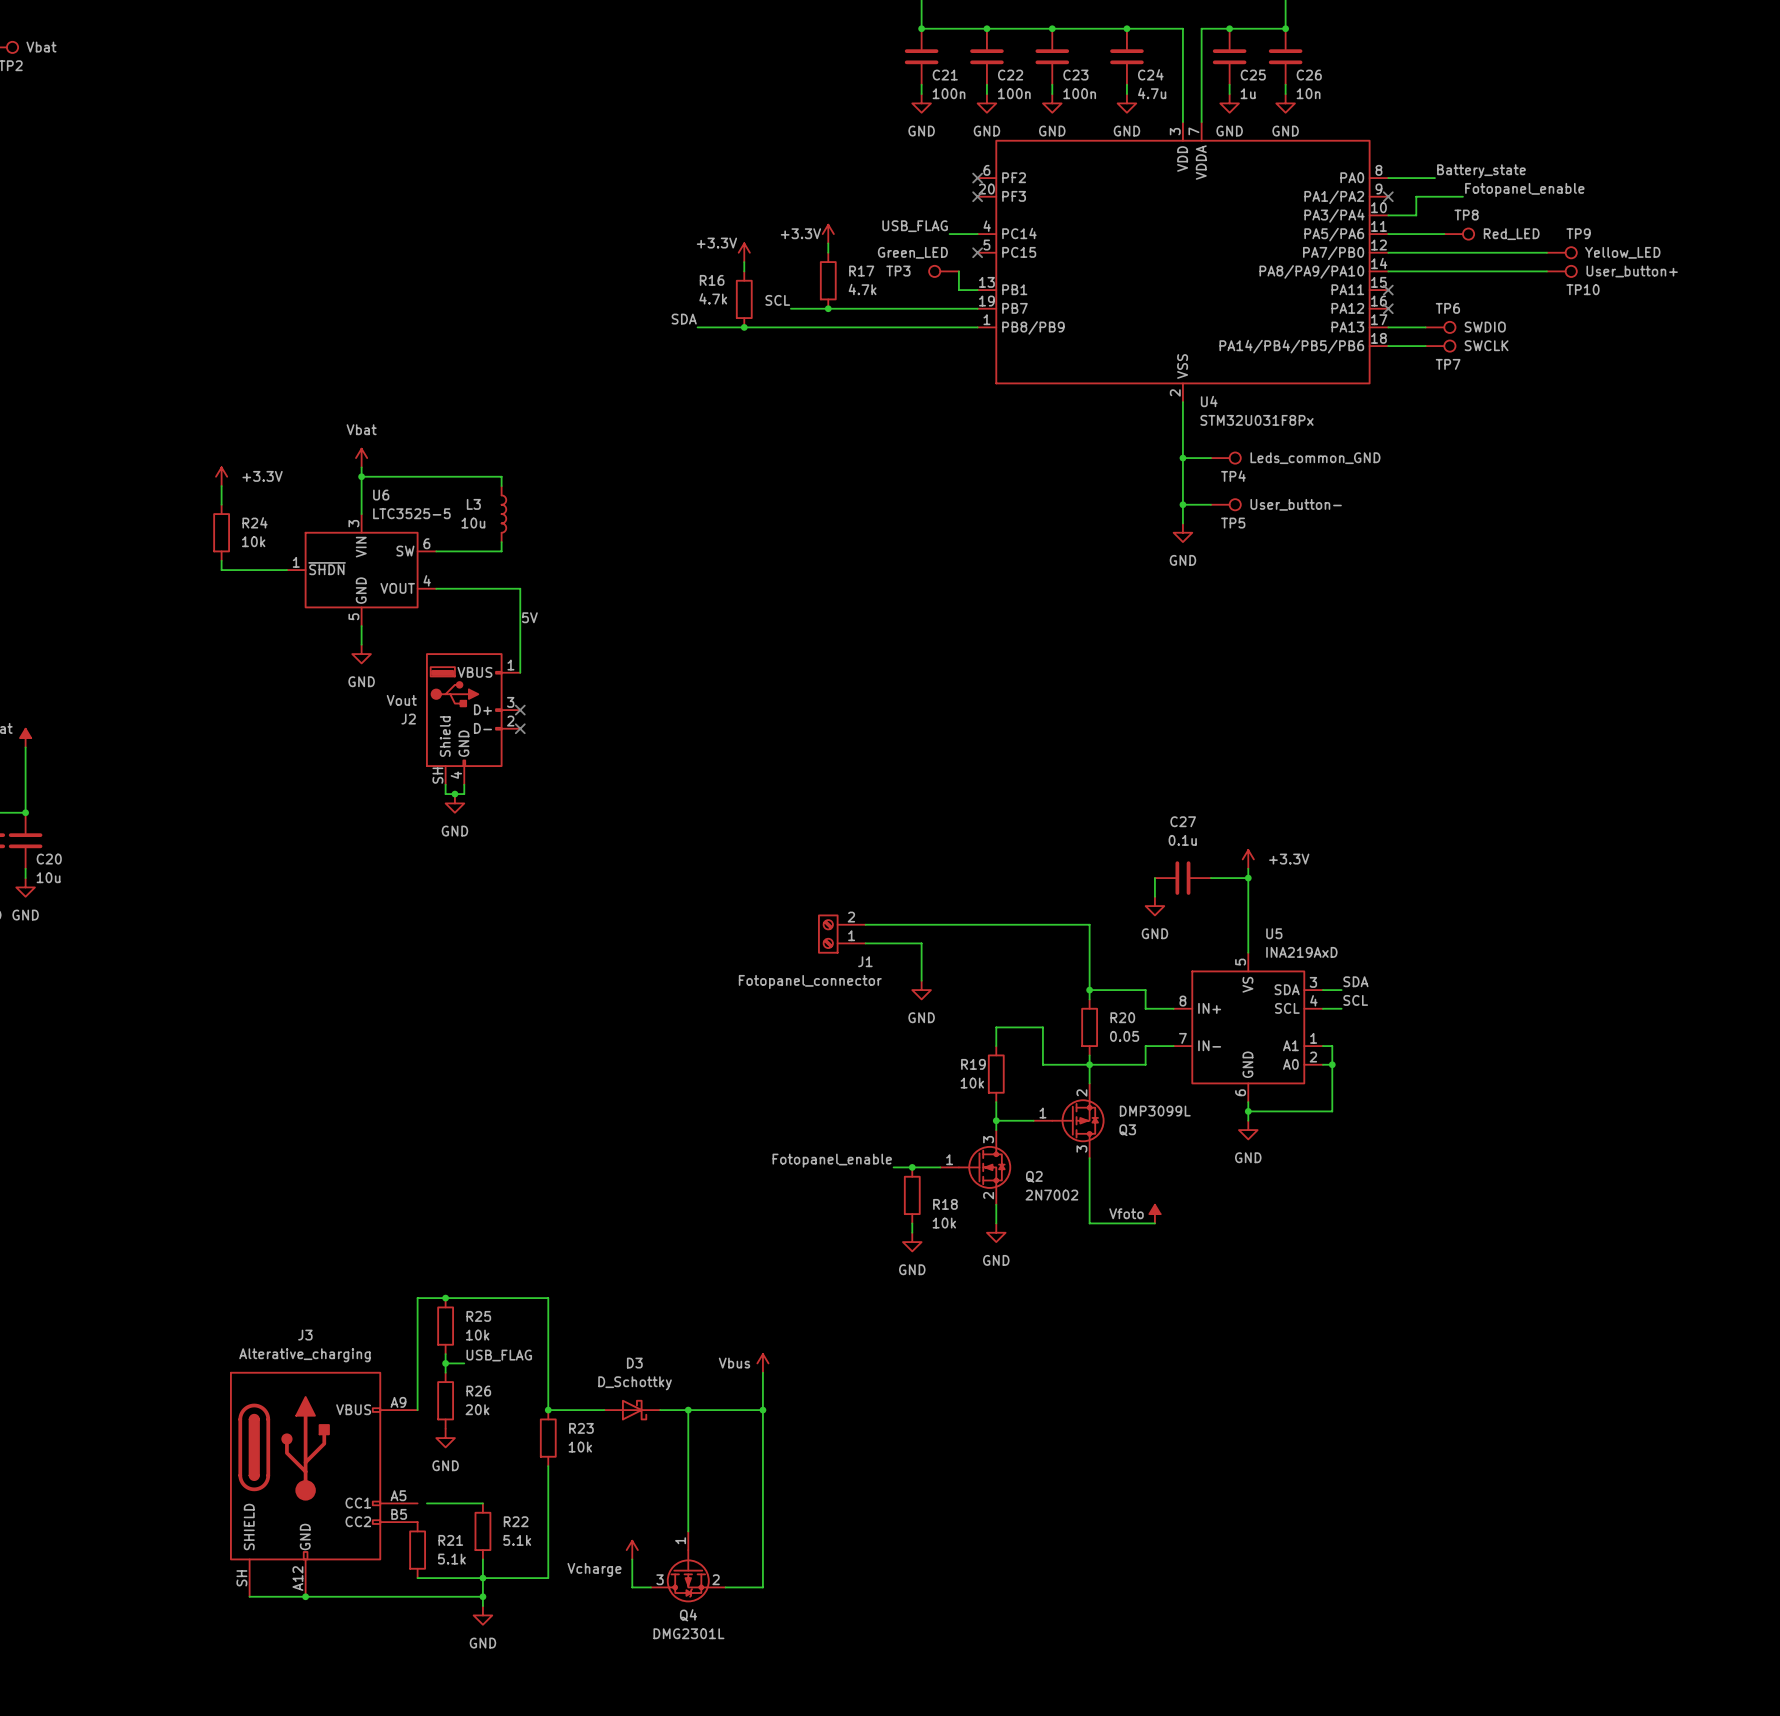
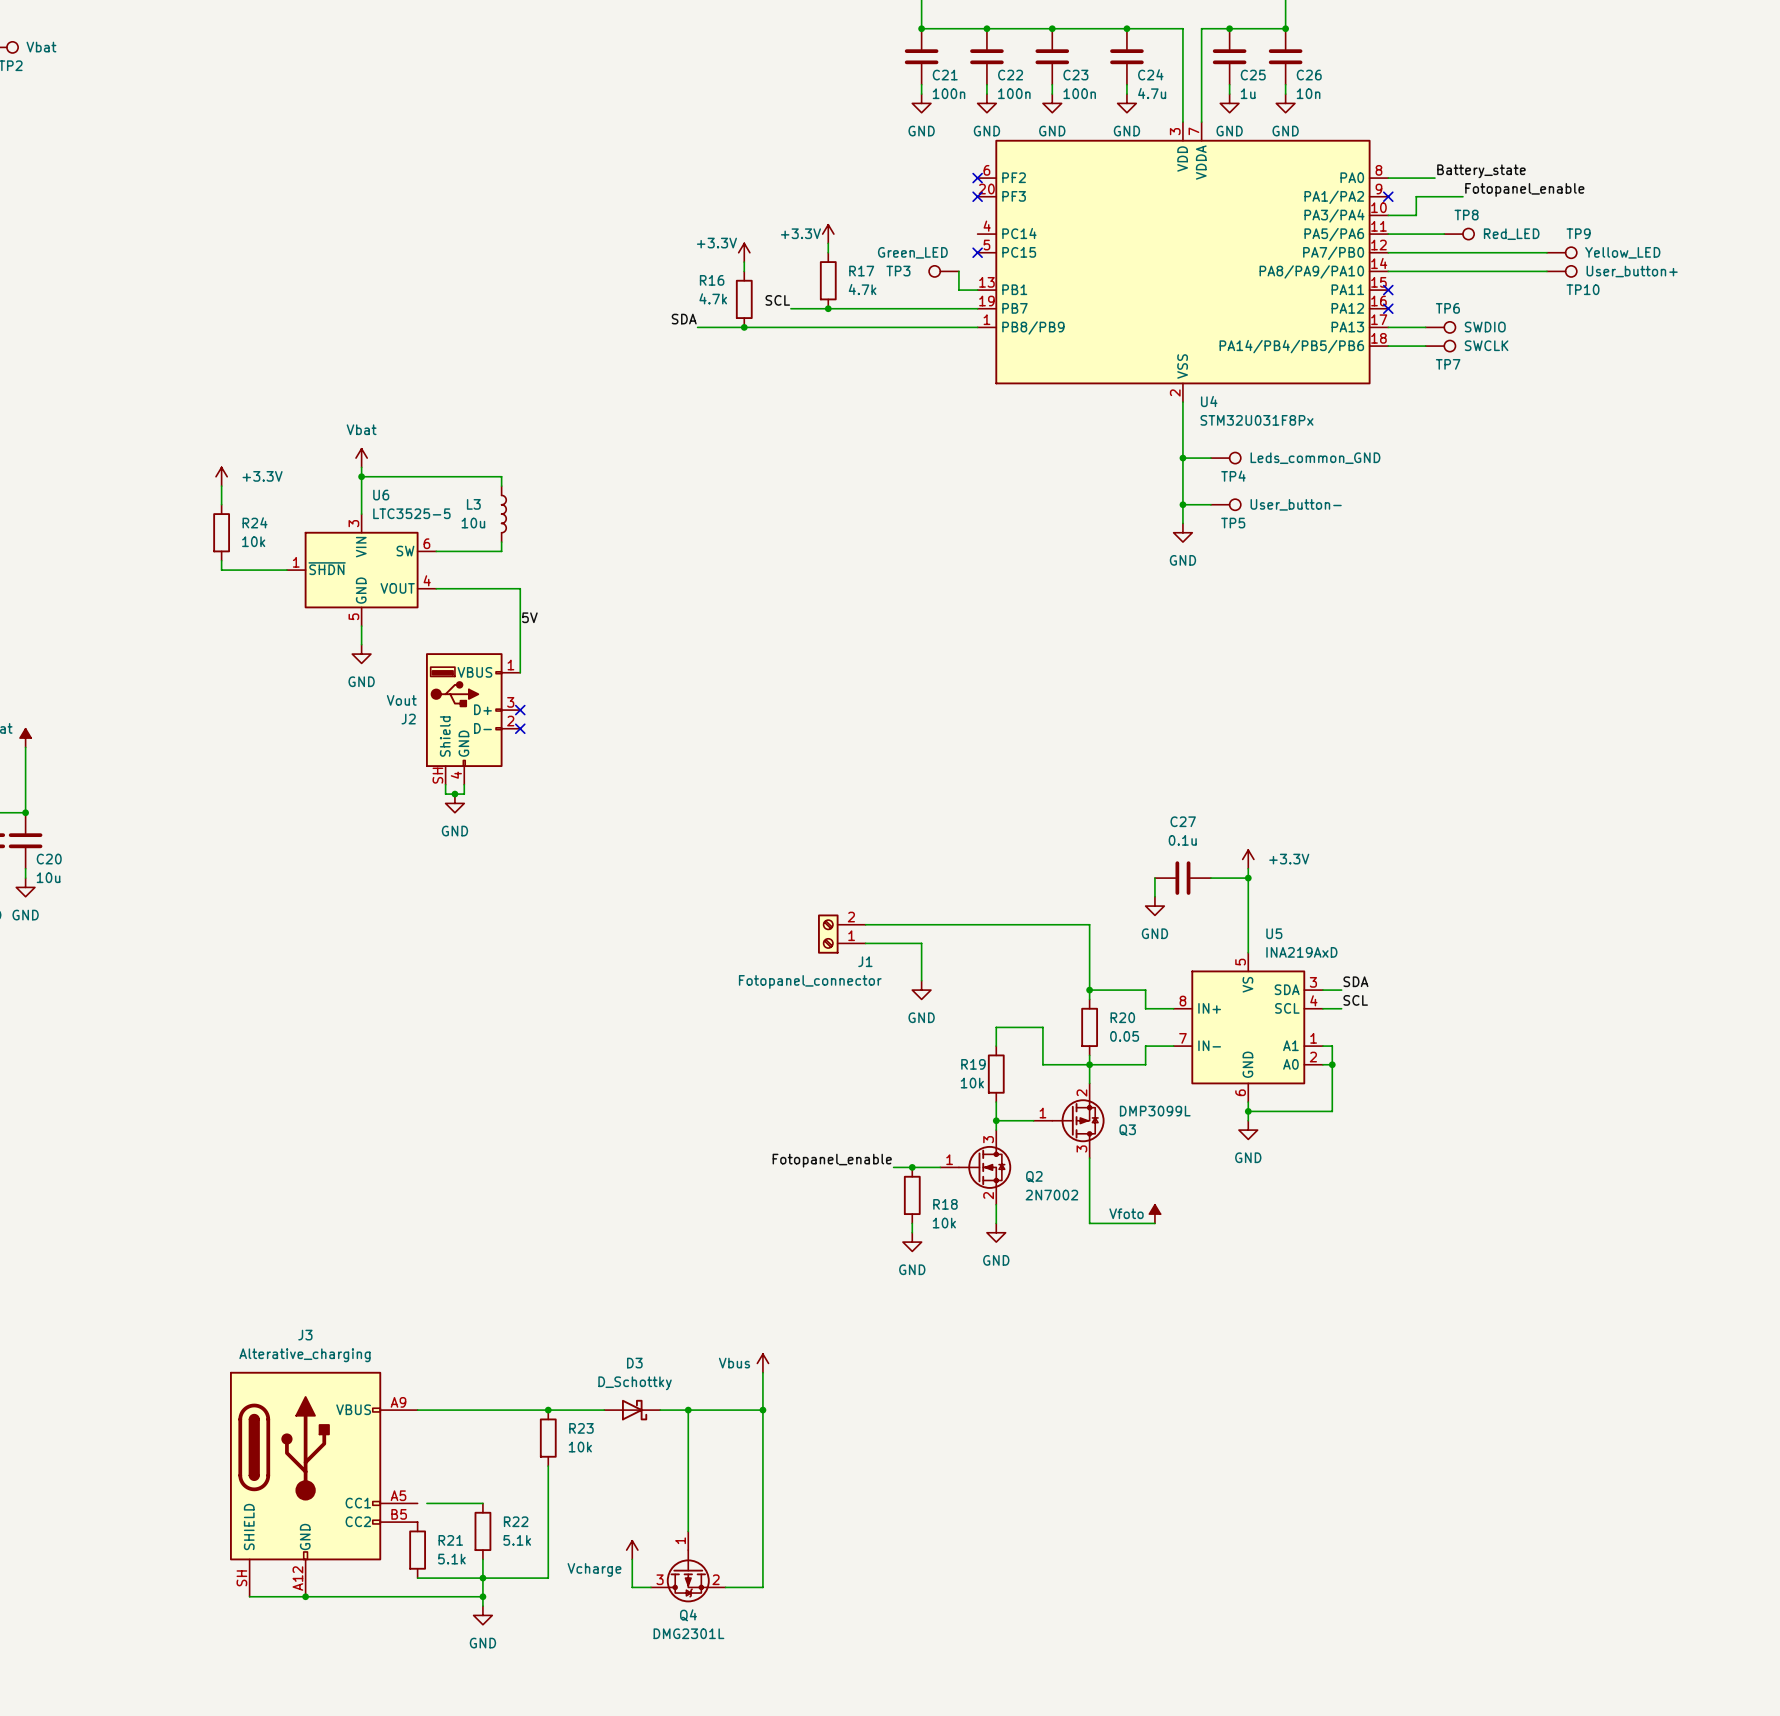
label: USB_FLAG (915, 226) -> none
wire: (949, 234) (977, 234) -> none
junction: (445, 1298) -> none
R25: 10k (445, 1326) -> none
wire: (445, 1354) (445, 1372) -> none
label: USB_FLAG (499, 1355) -> none
wire: (445, 1363) (464, 1363) -> none
junction: (445, 1363) -> none
R26: 20k (445, 1400) -> none
wire: (417, 1410) (417, 1298) (548, 1298) (548, 1410) -> (417, 1410) (548, 1410)
power symbol: GND (445, 1438) -> none

